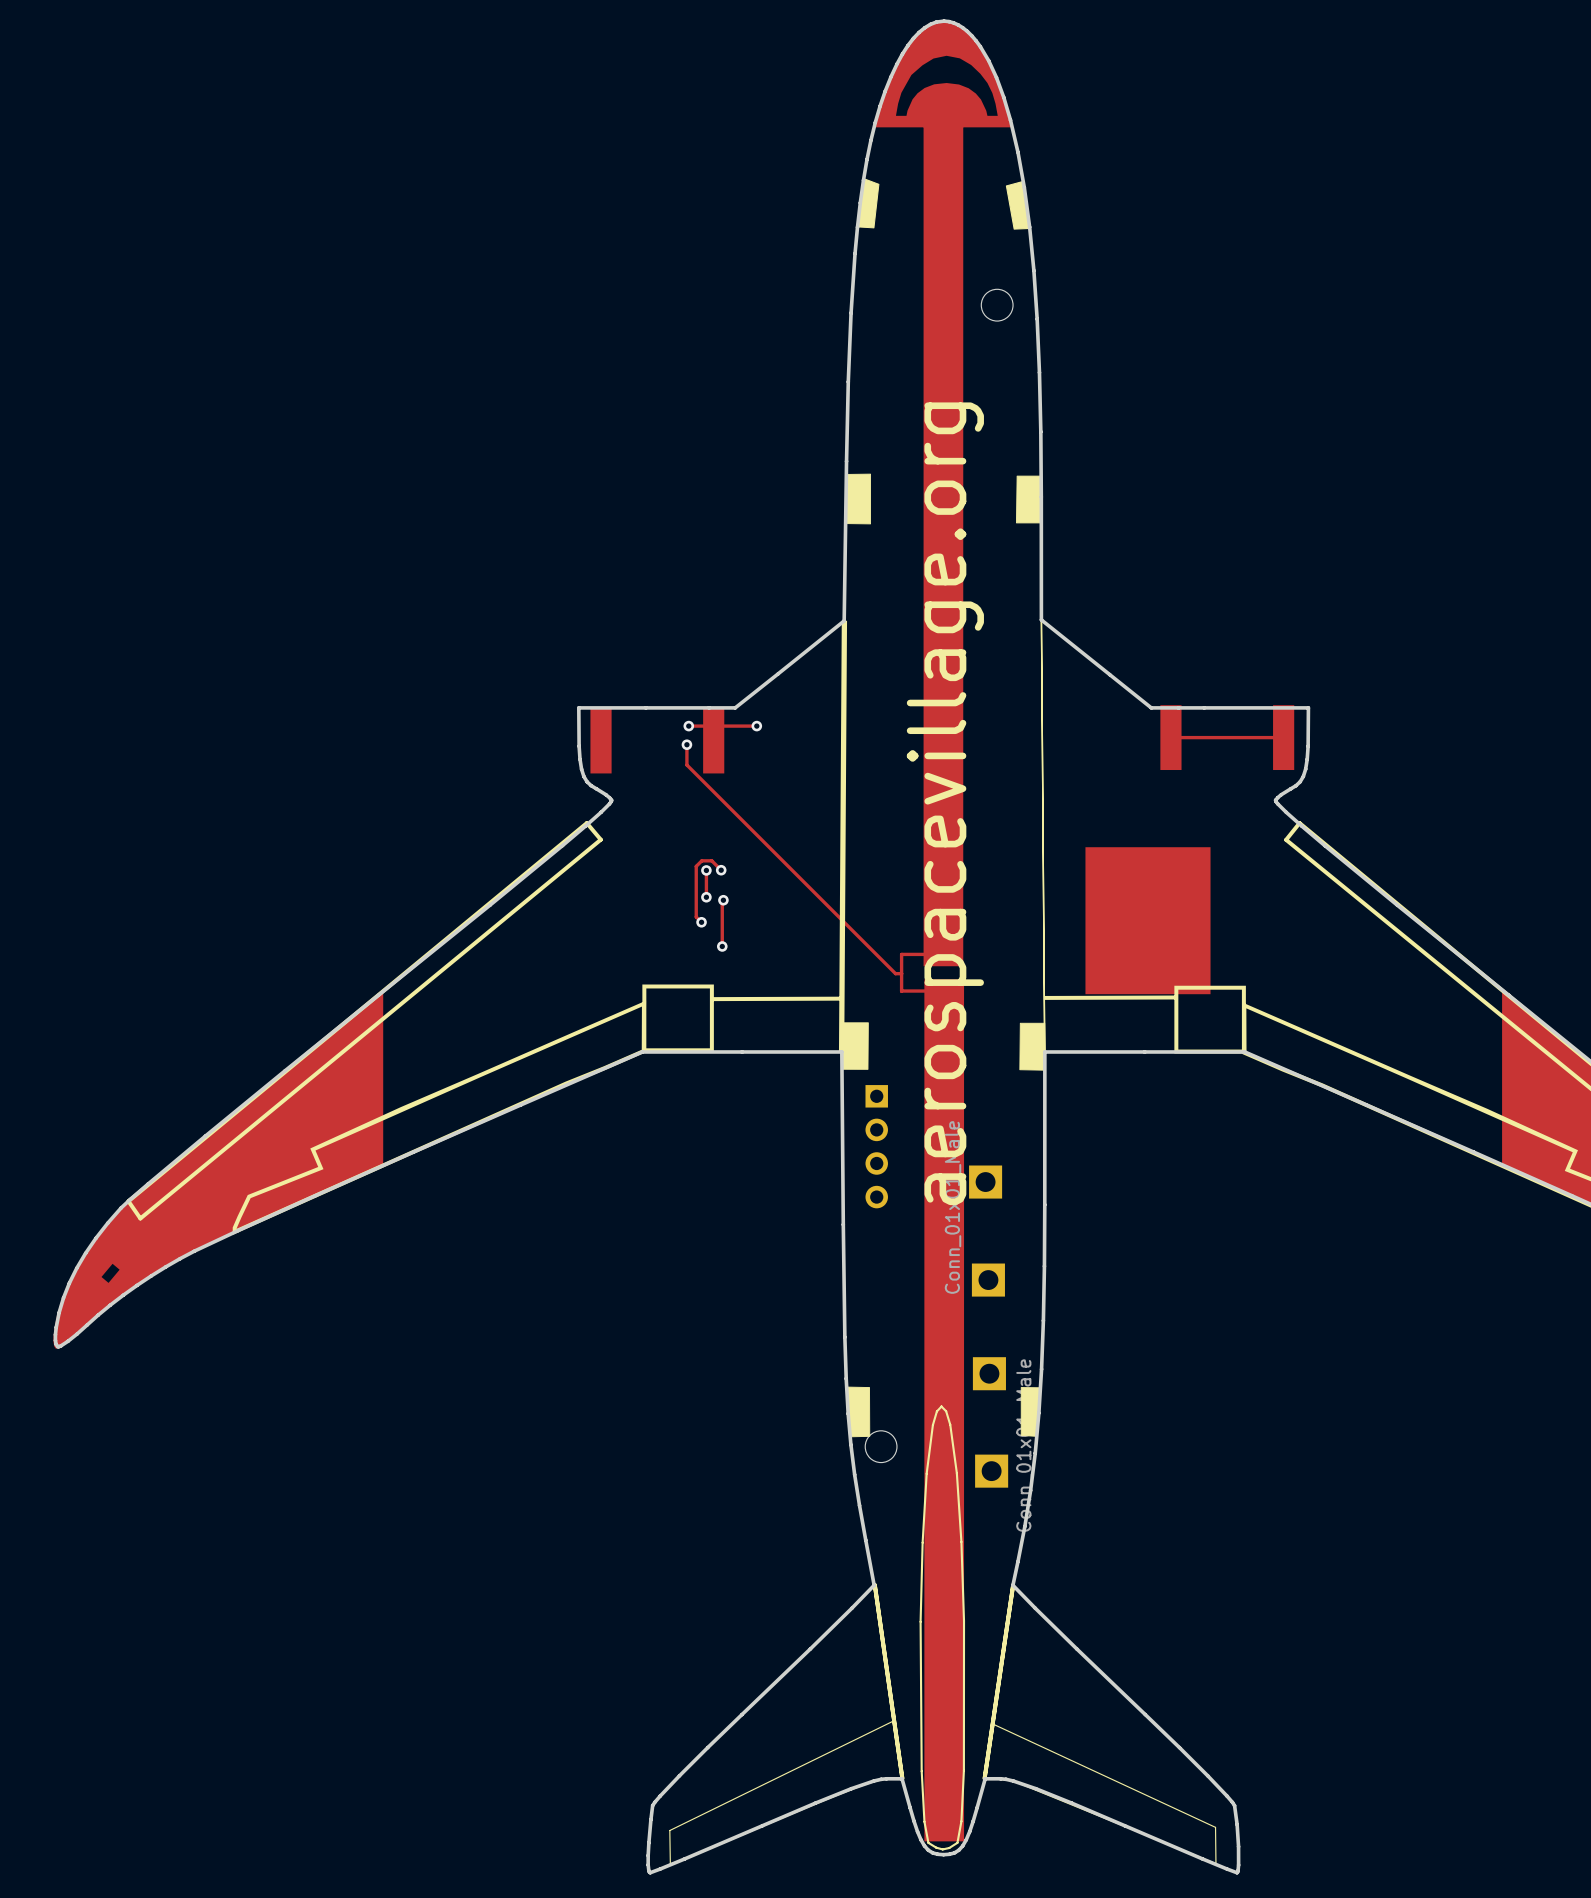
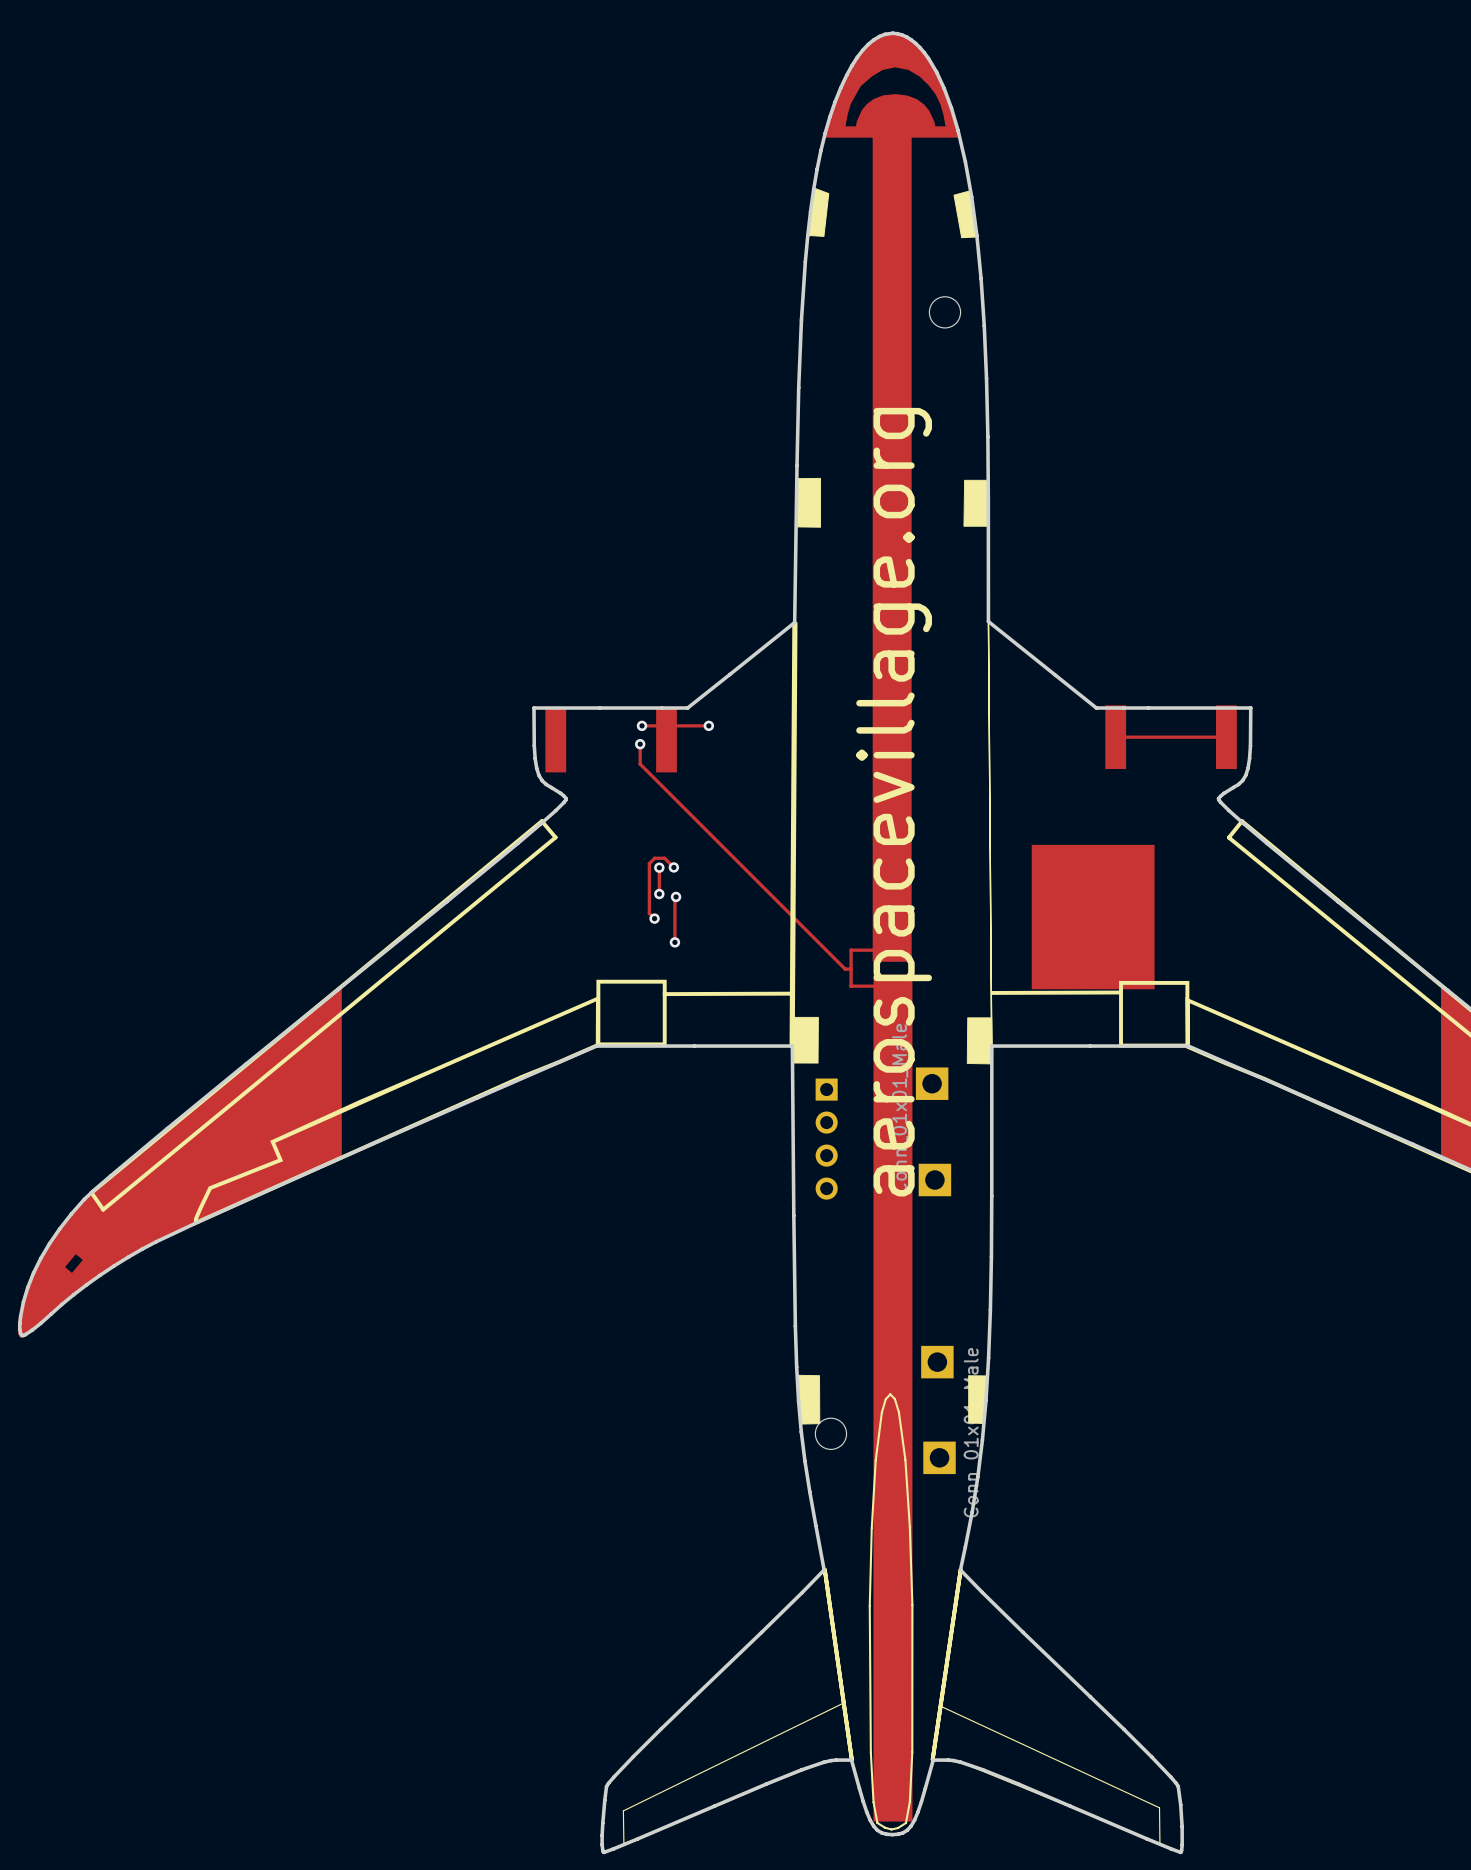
part position: (987, 1231) -> (933, 1131)

